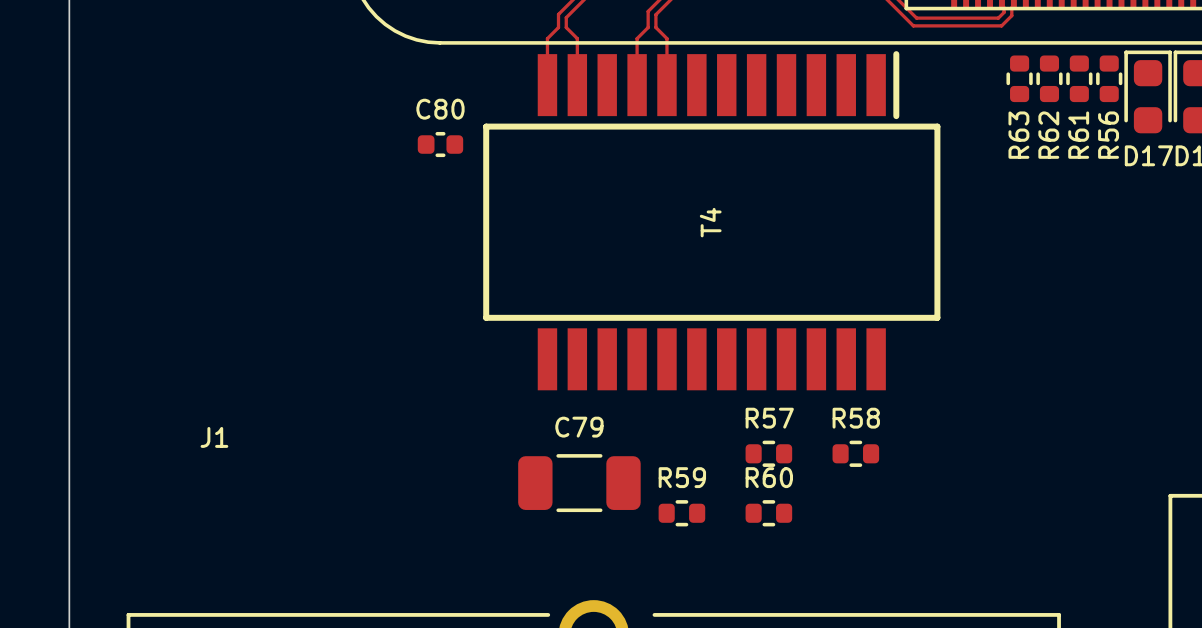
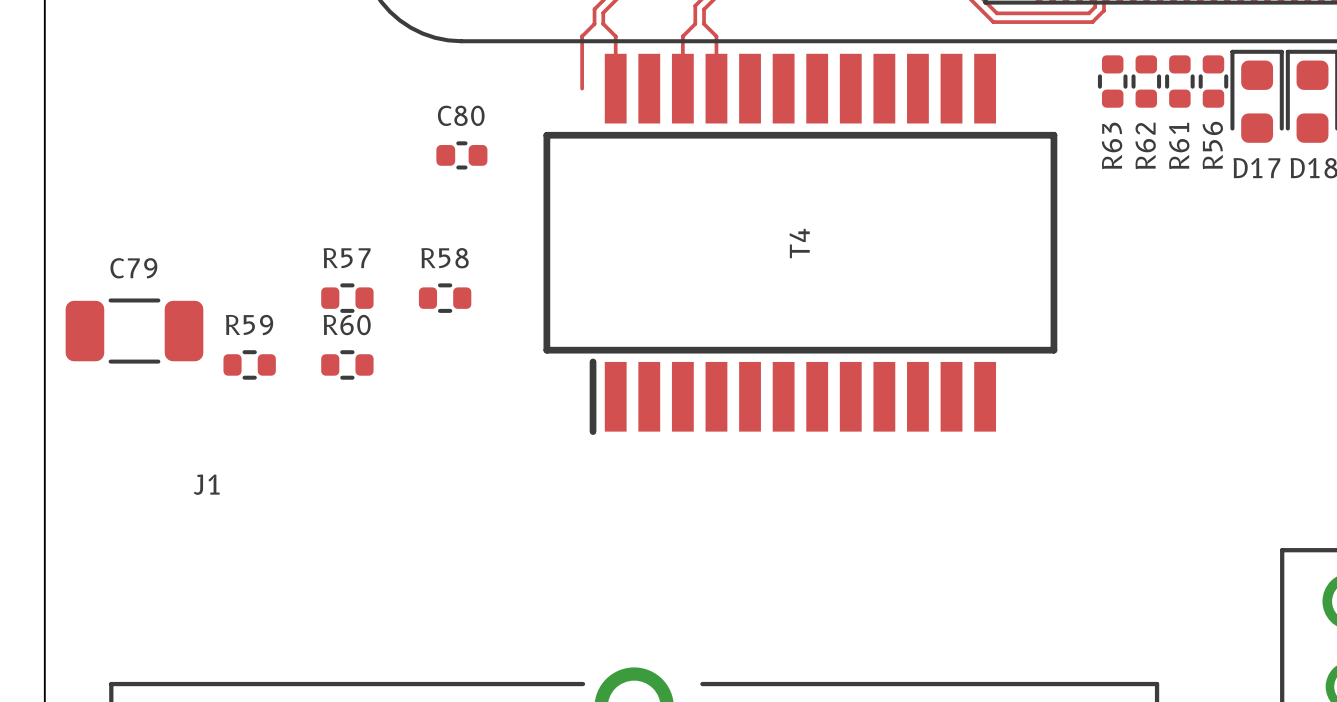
T4 rotation: 0° (711, 220) -> 180° (800, 244)
R57 position: (768, 453) -> (347, 298)
R58 position: (855, 453) -> (445, 298)
C79 position: (579, 483) -> (134, 331)
R59 position: (681, 513) -> (249, 364)
R60 position: (768, 513) -> (347, 364)

